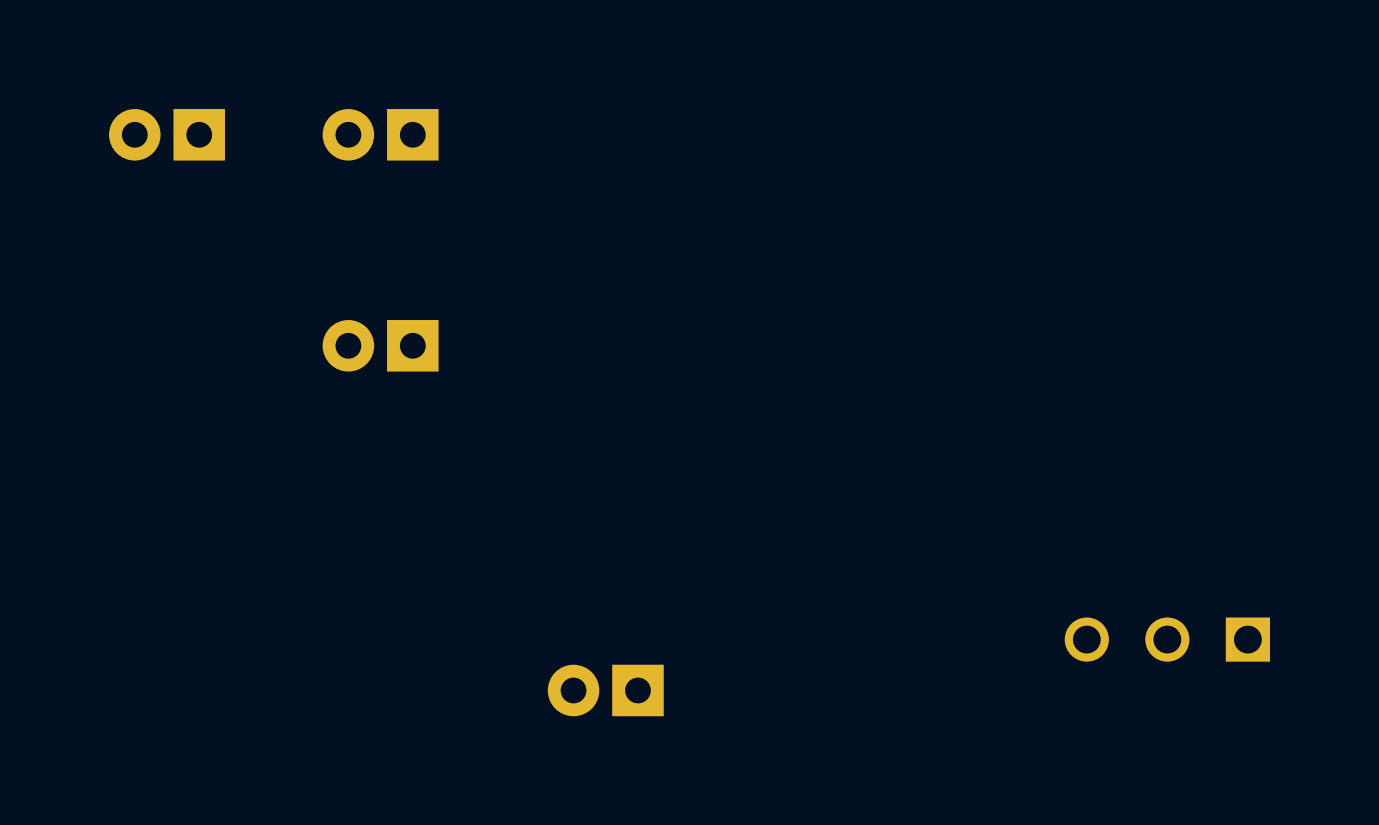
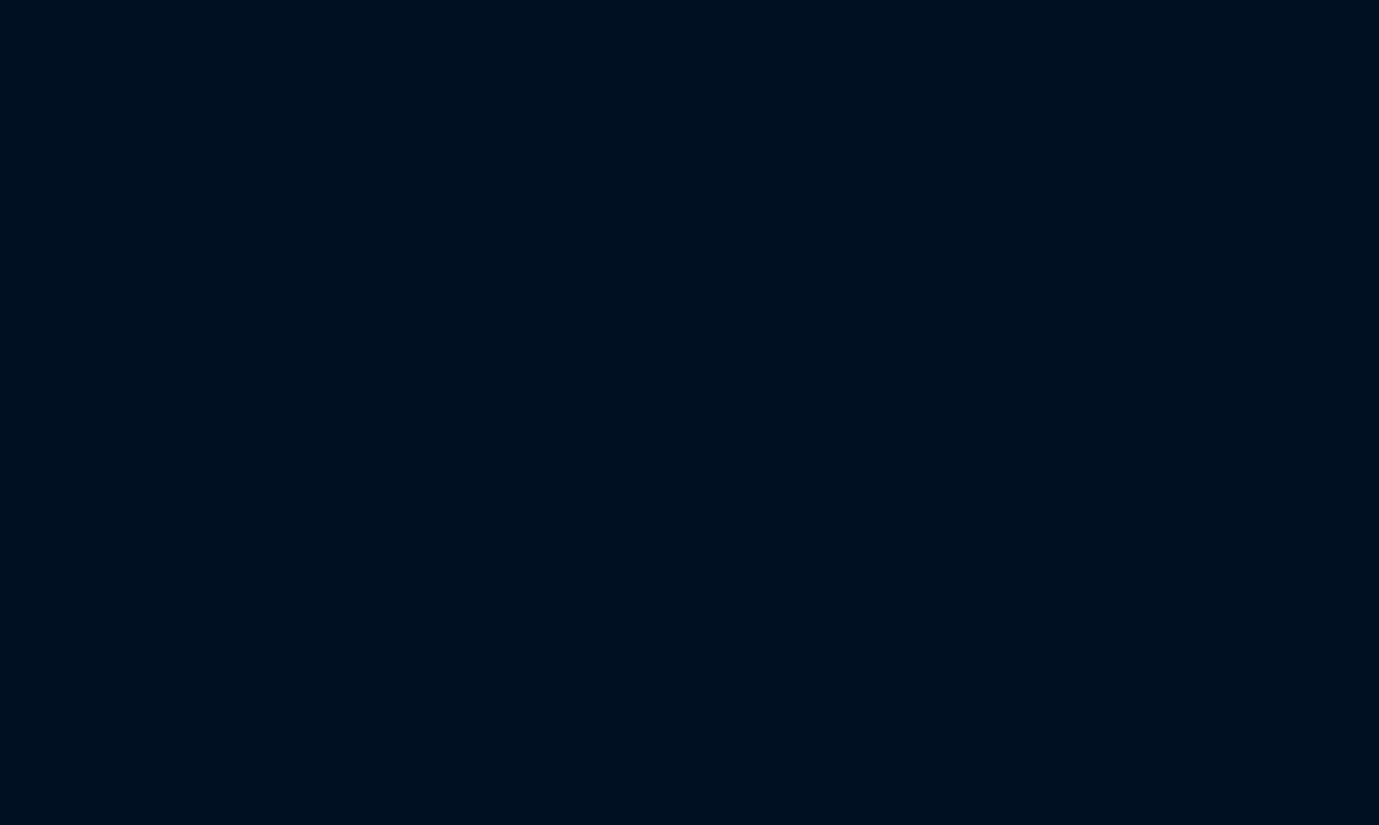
part: (167, 134) -> none
part: (380, 134) -> none
part: (380, 345) -> none
part: (1167, 639) -> none
part: (605, 690) -> none

